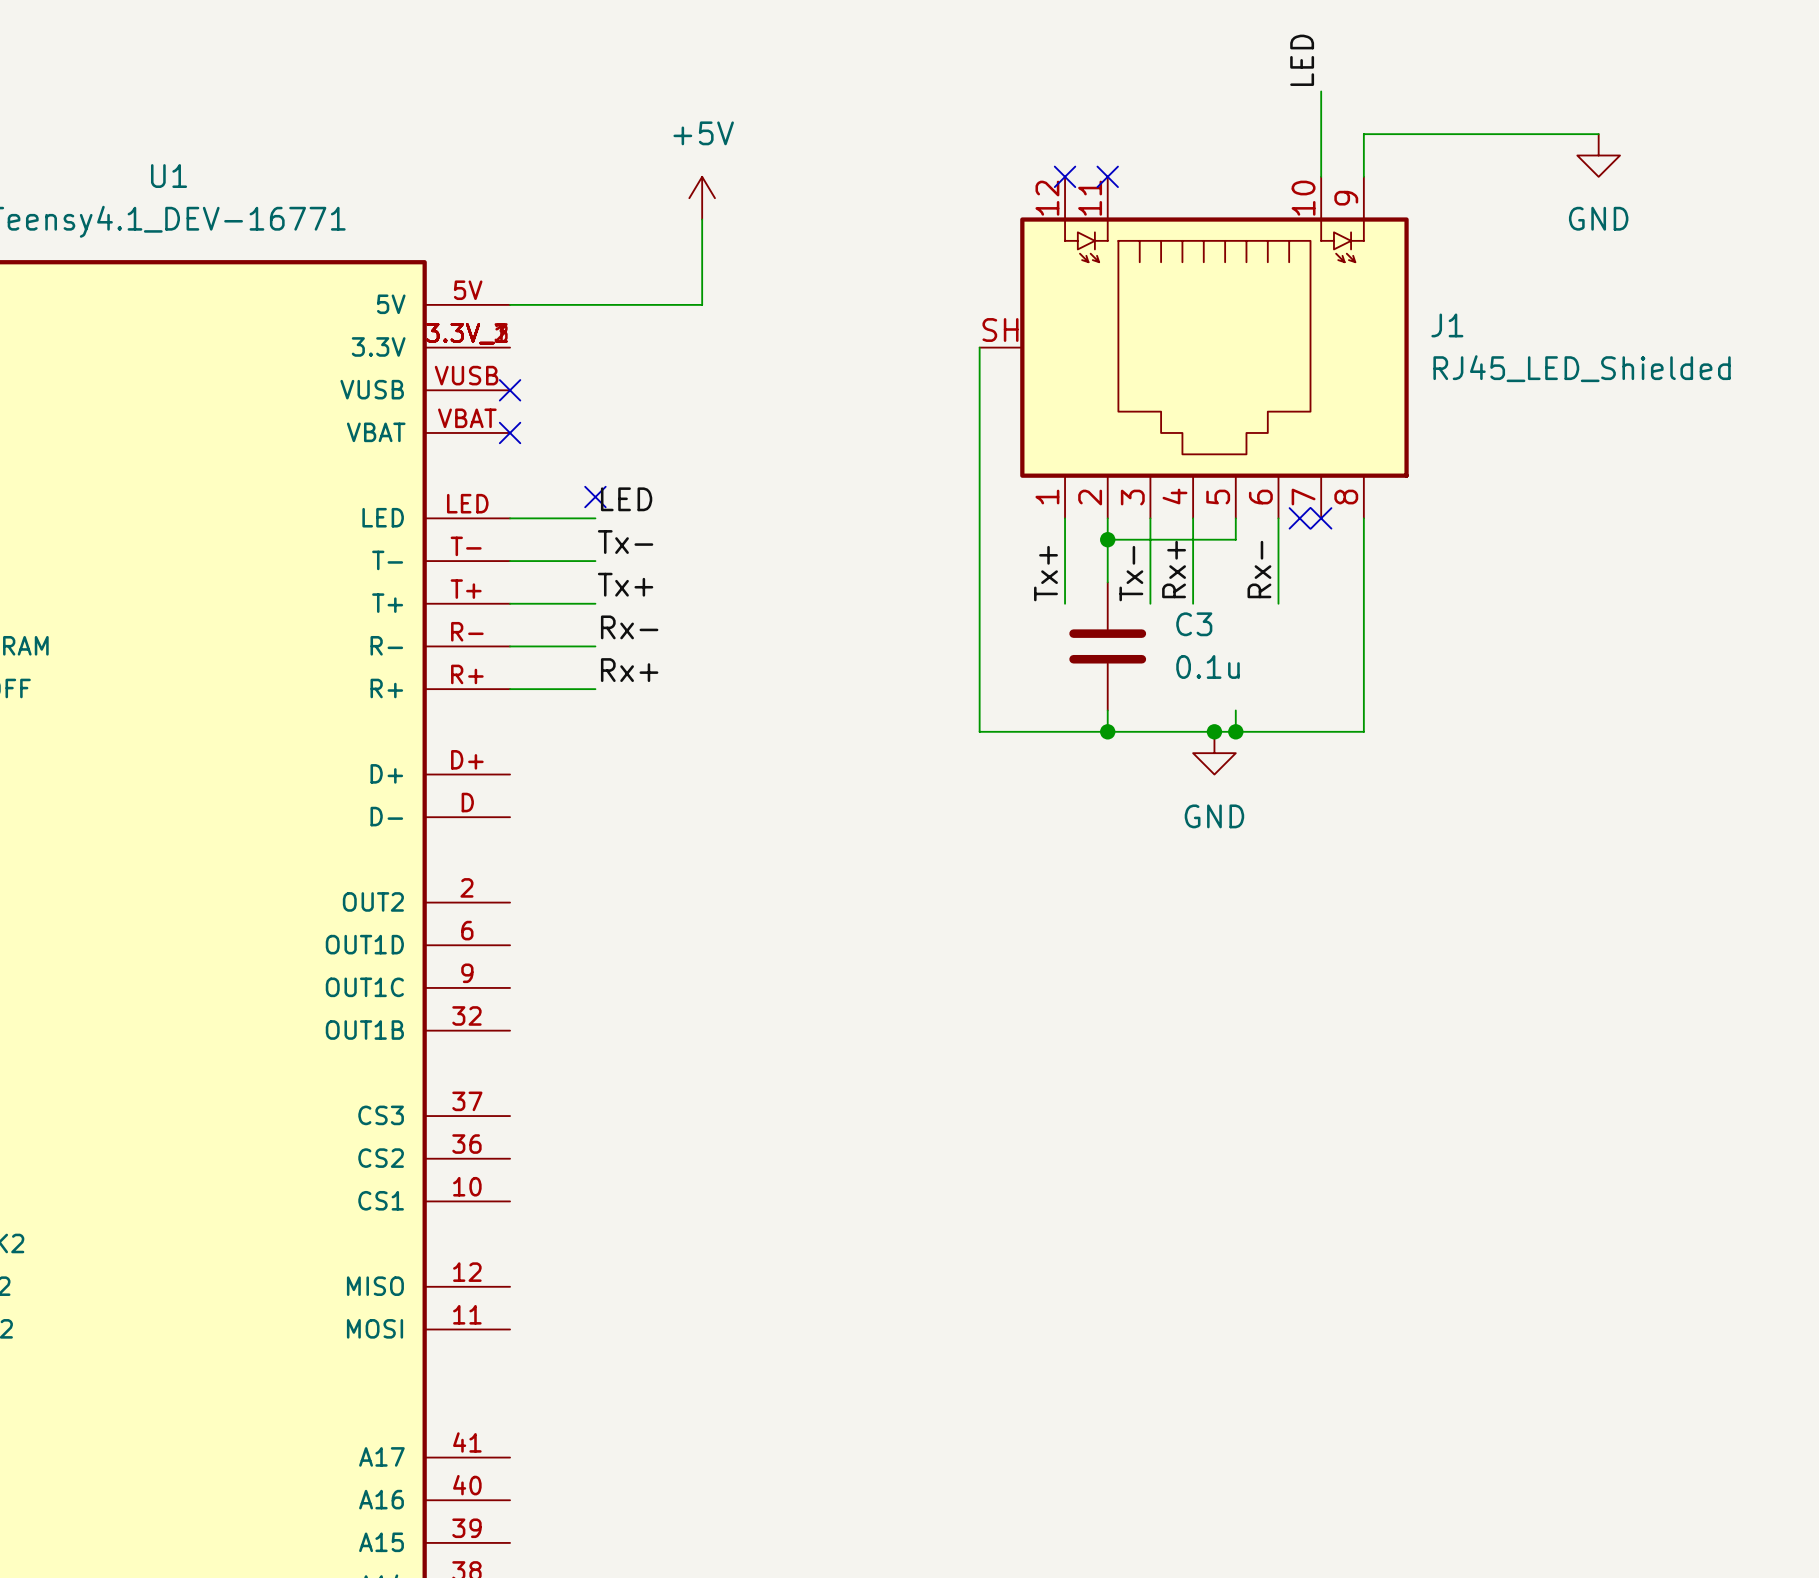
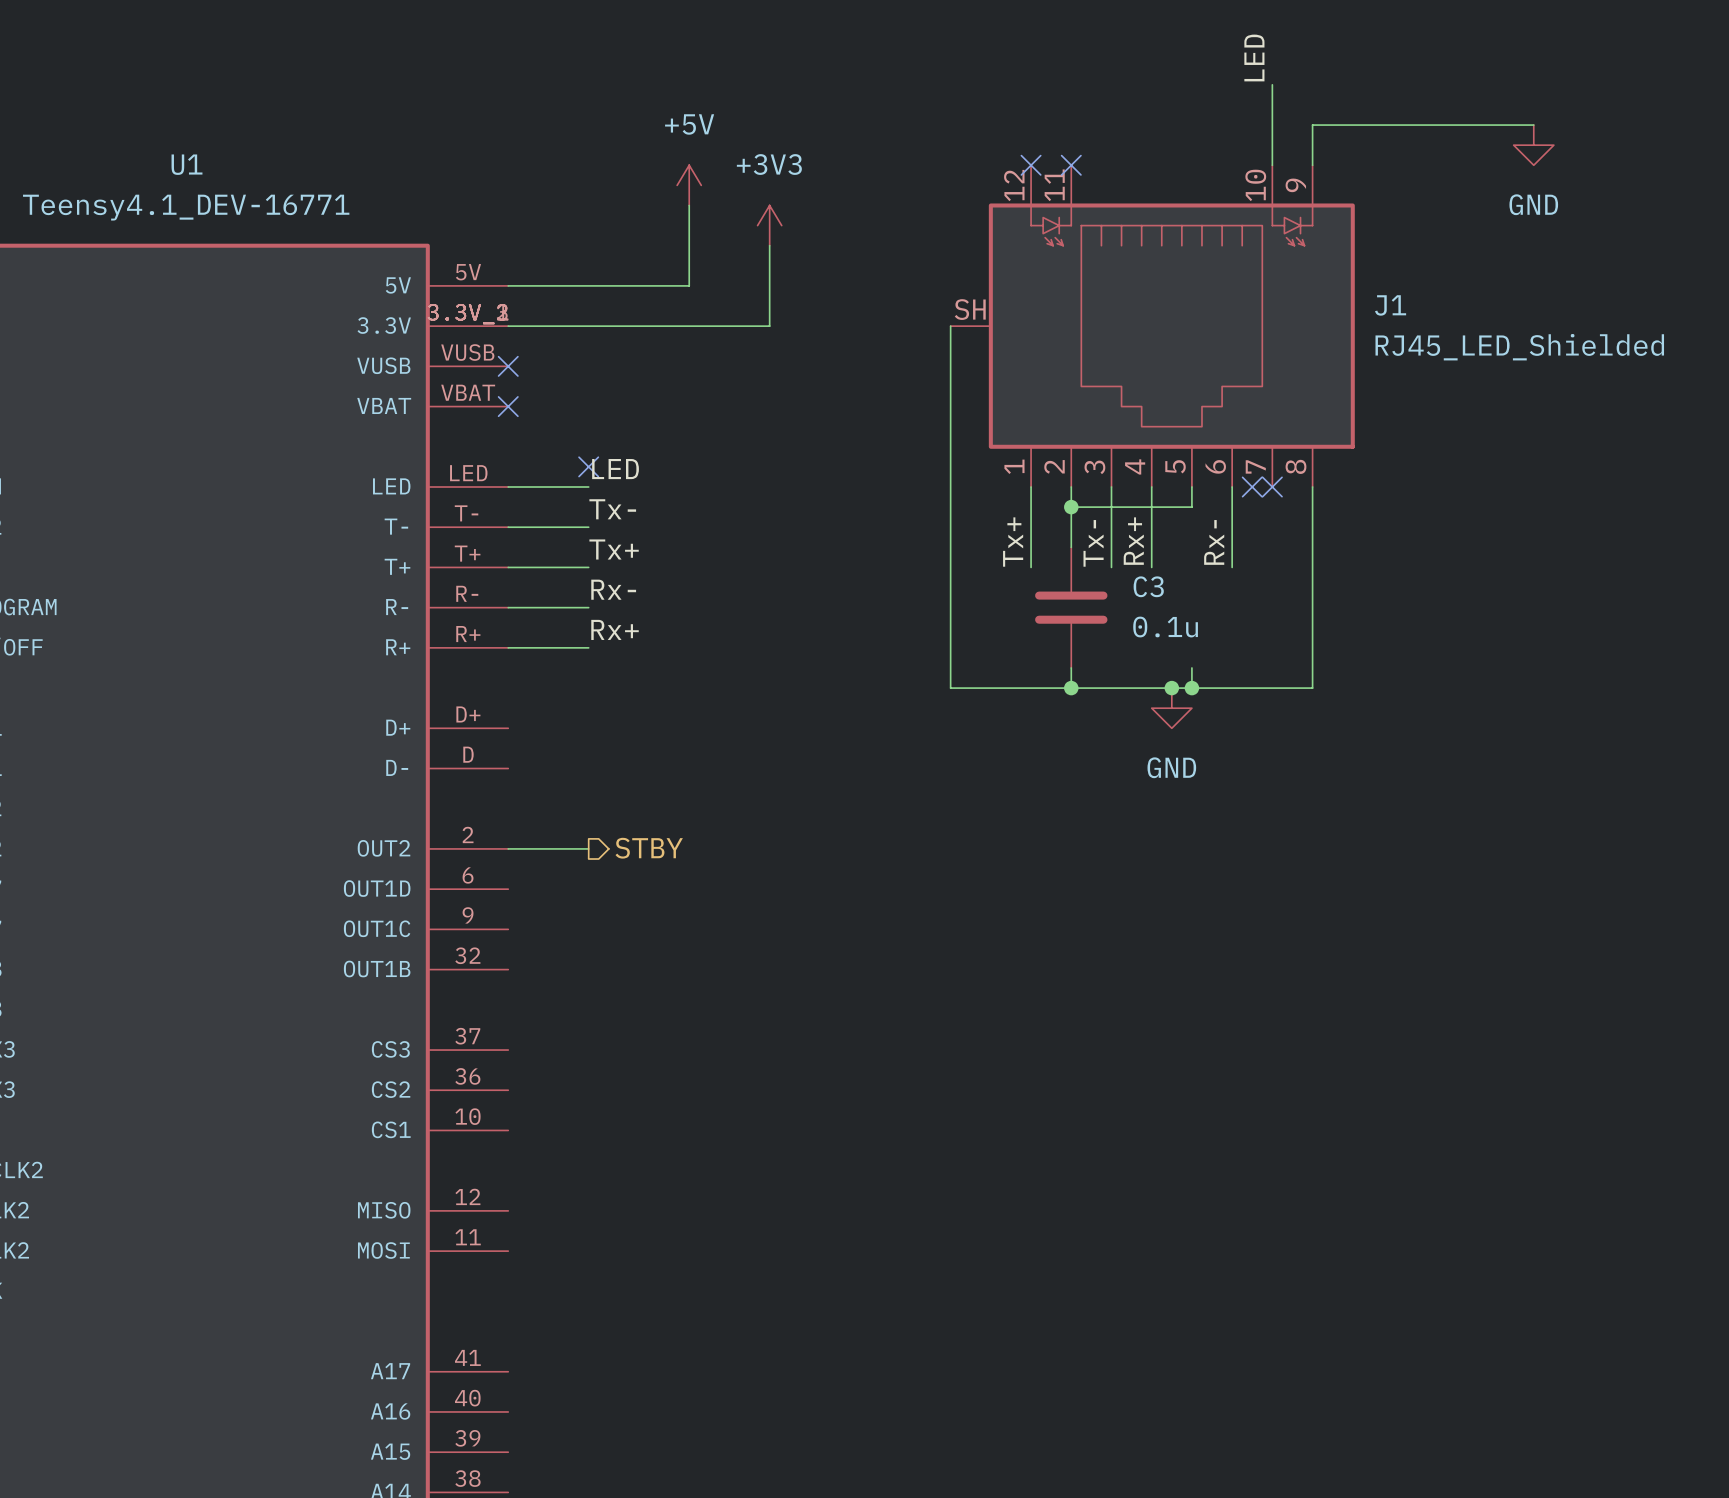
power symbol: none -> +3V3 (769, 225)
wire: none -> (769, 245) (769, 326) (508, 326)
hierarchical label: none -> STBY (649, 848)
wire: none -> (508, 848) (588, 848)

